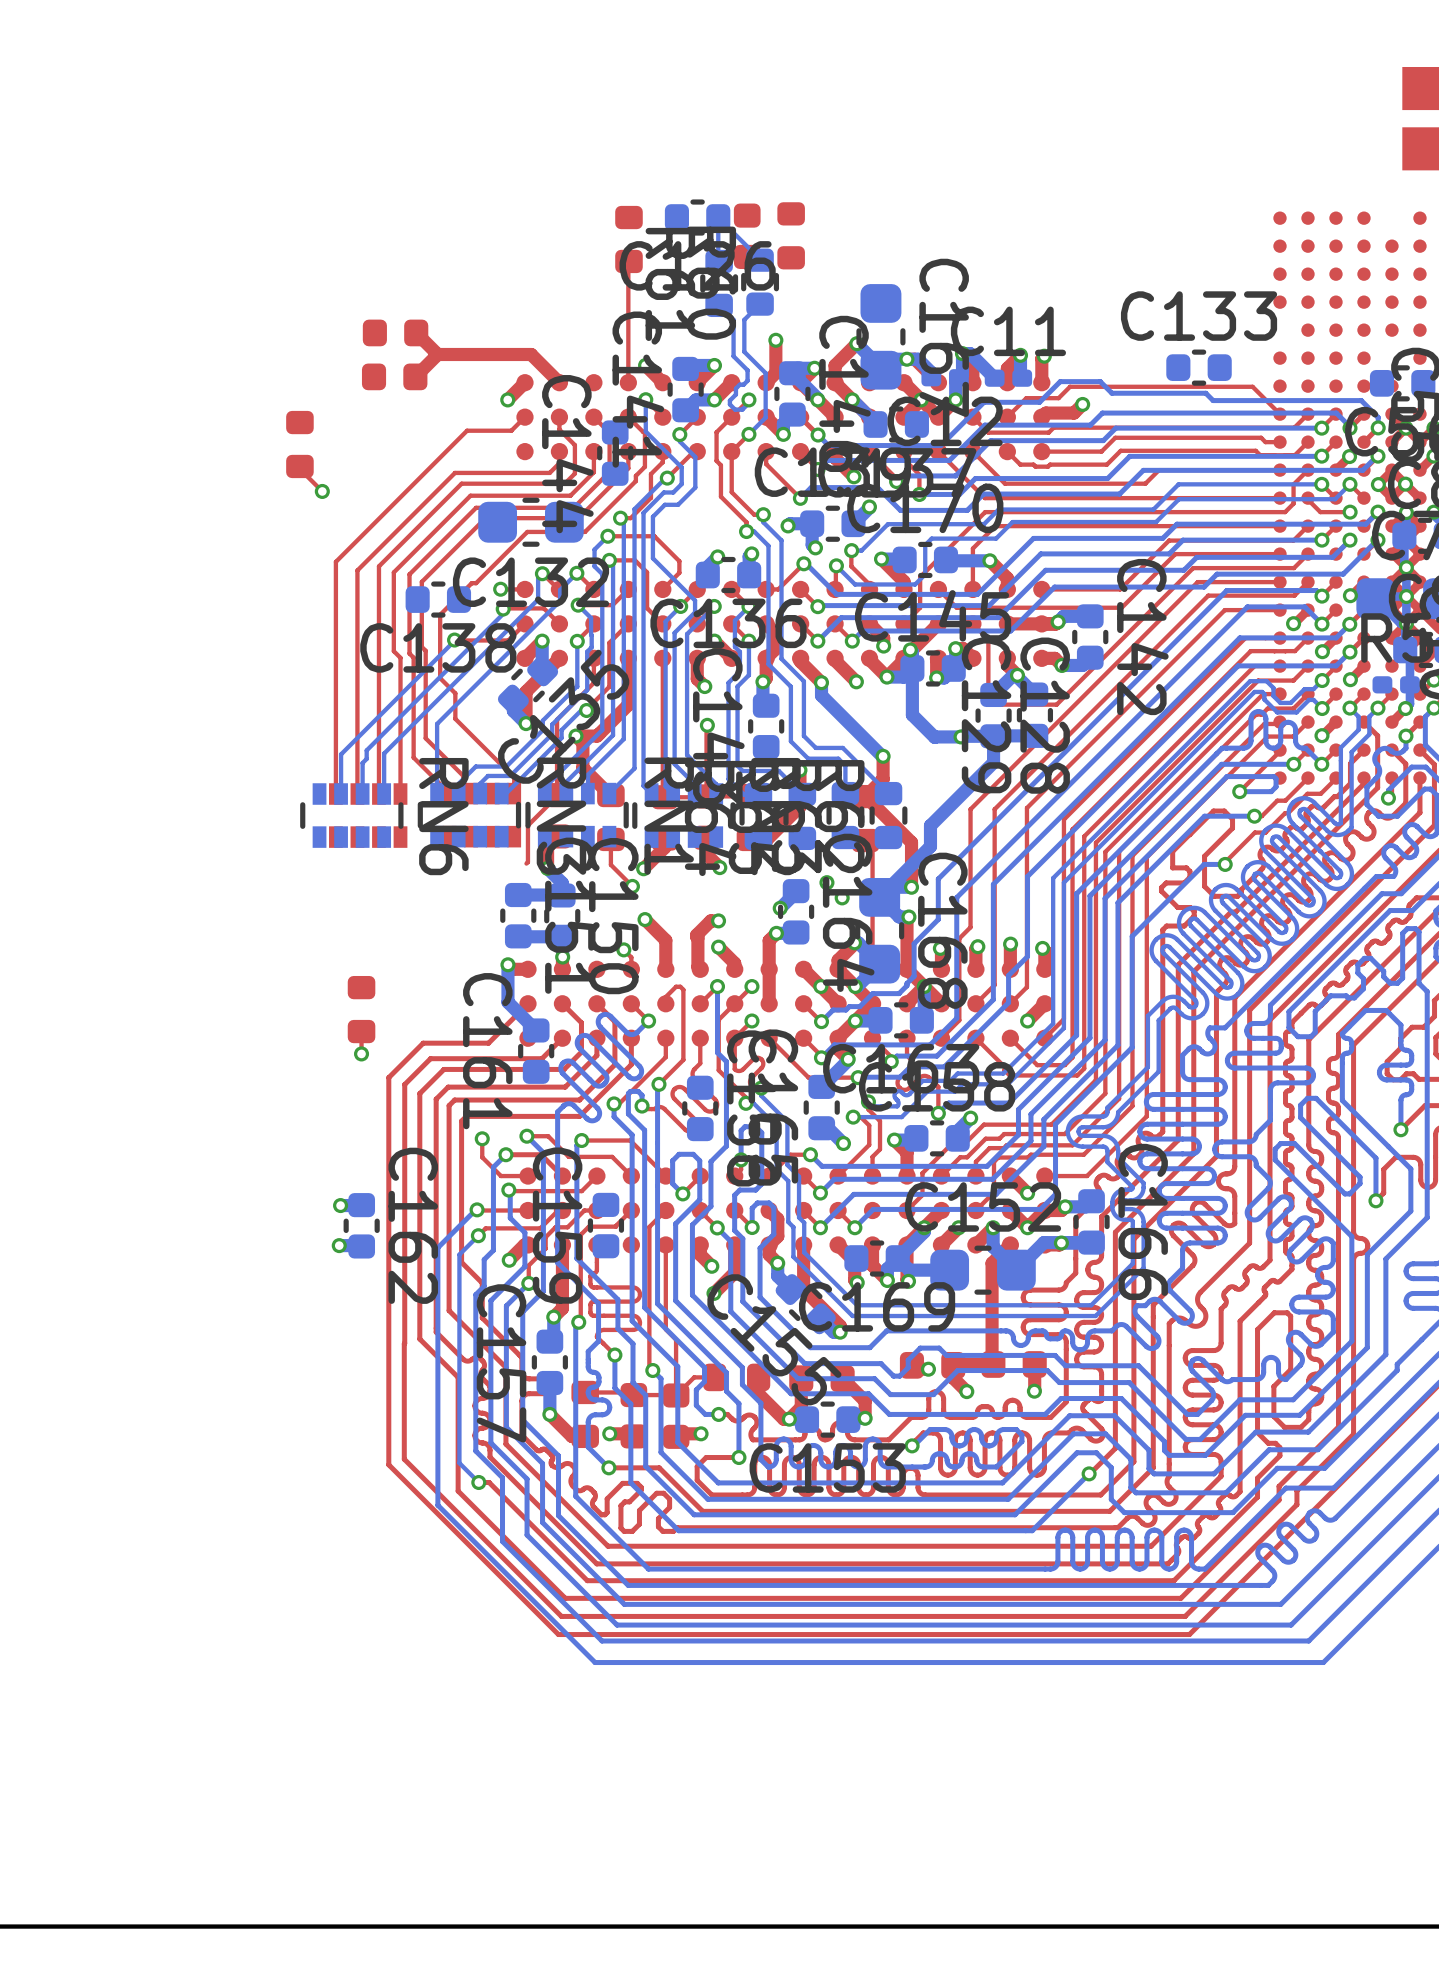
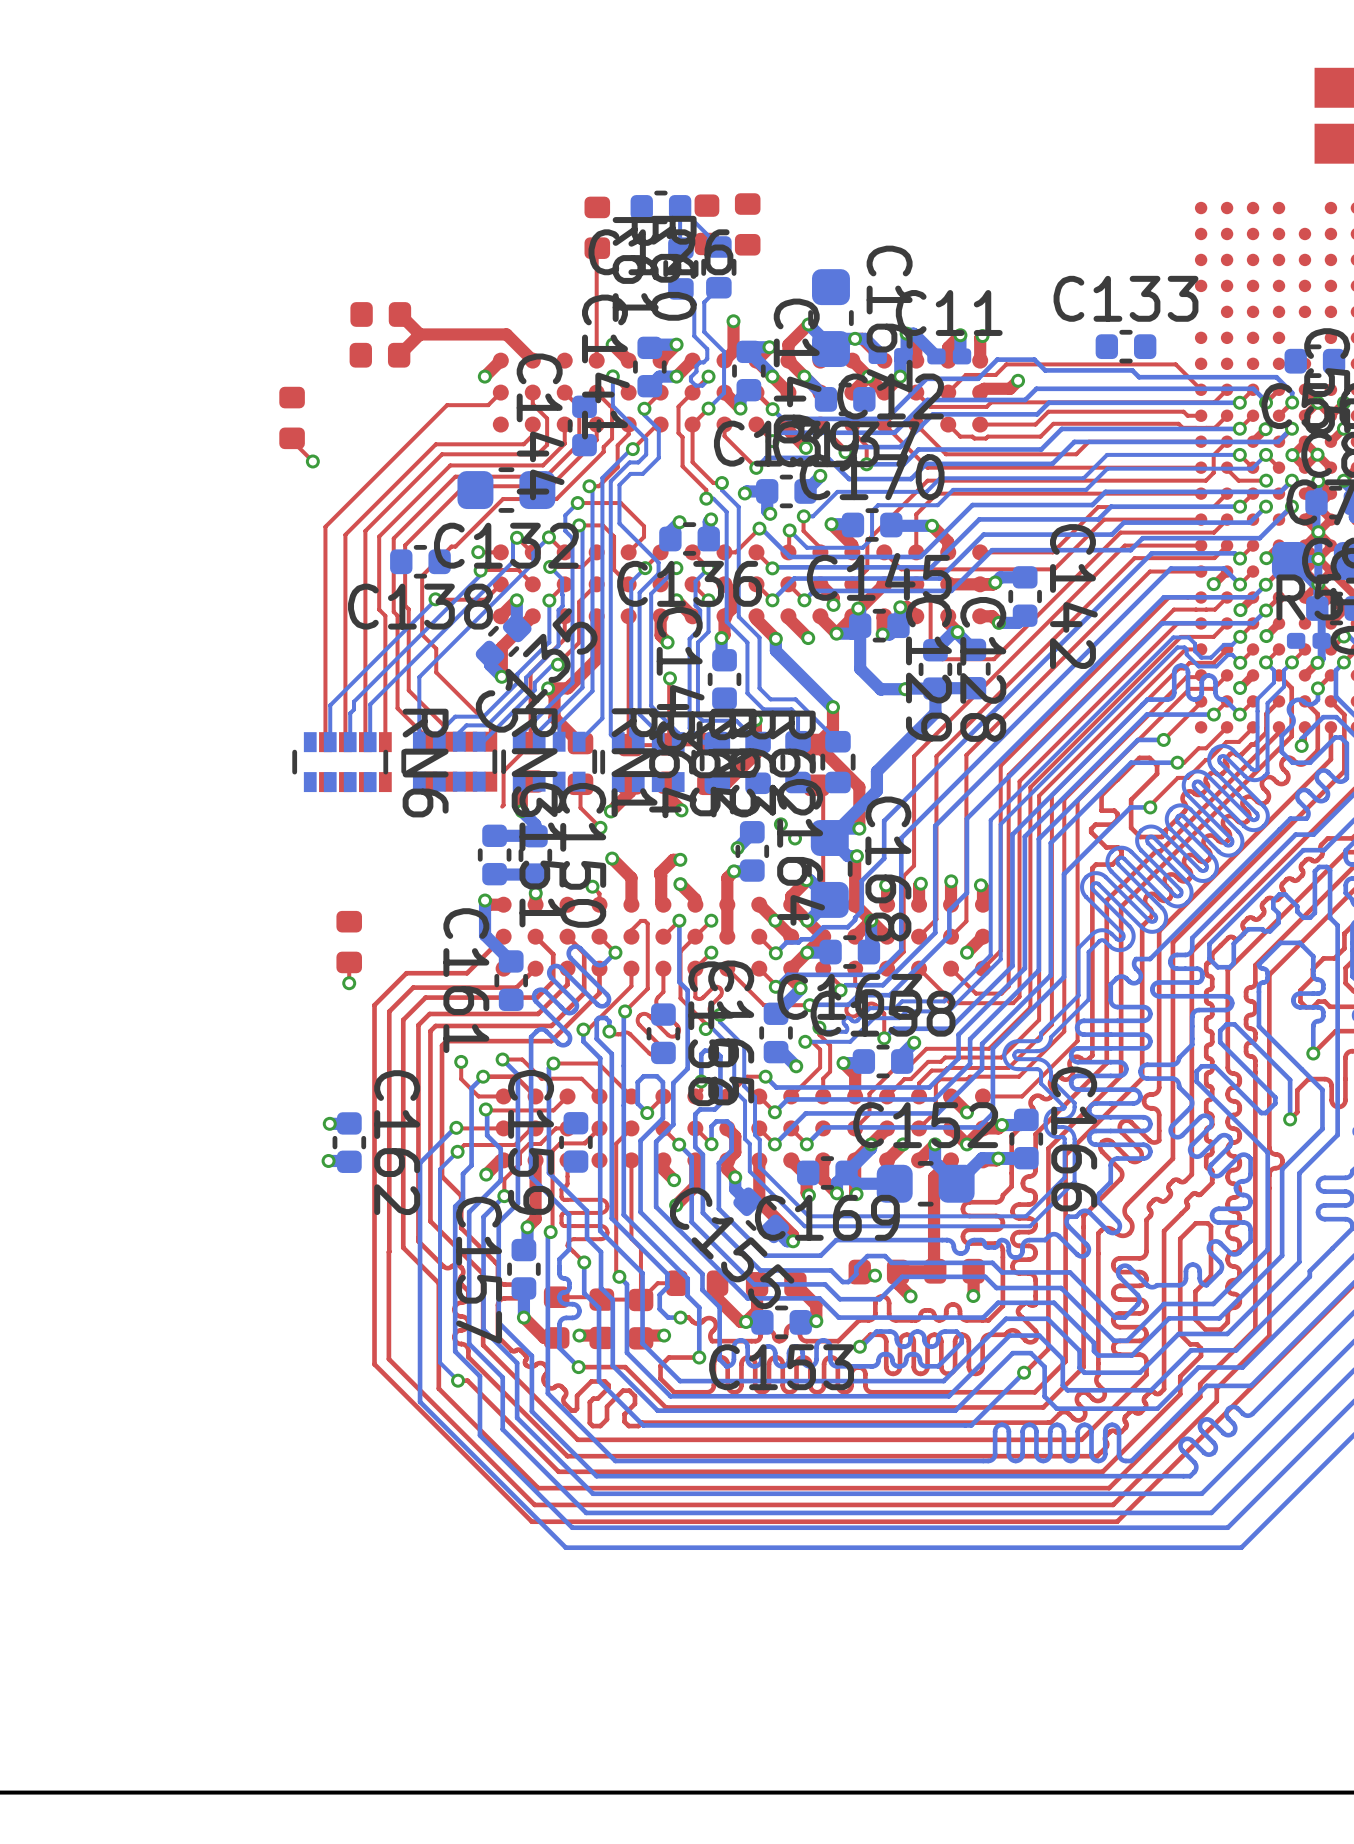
bottom track: (1239, 791) (1271, 791) (1276, 786) (1276, 778) (1273, 776) (1226, 776) (1211, 791) -> (1163, 739) (1137, 739)

